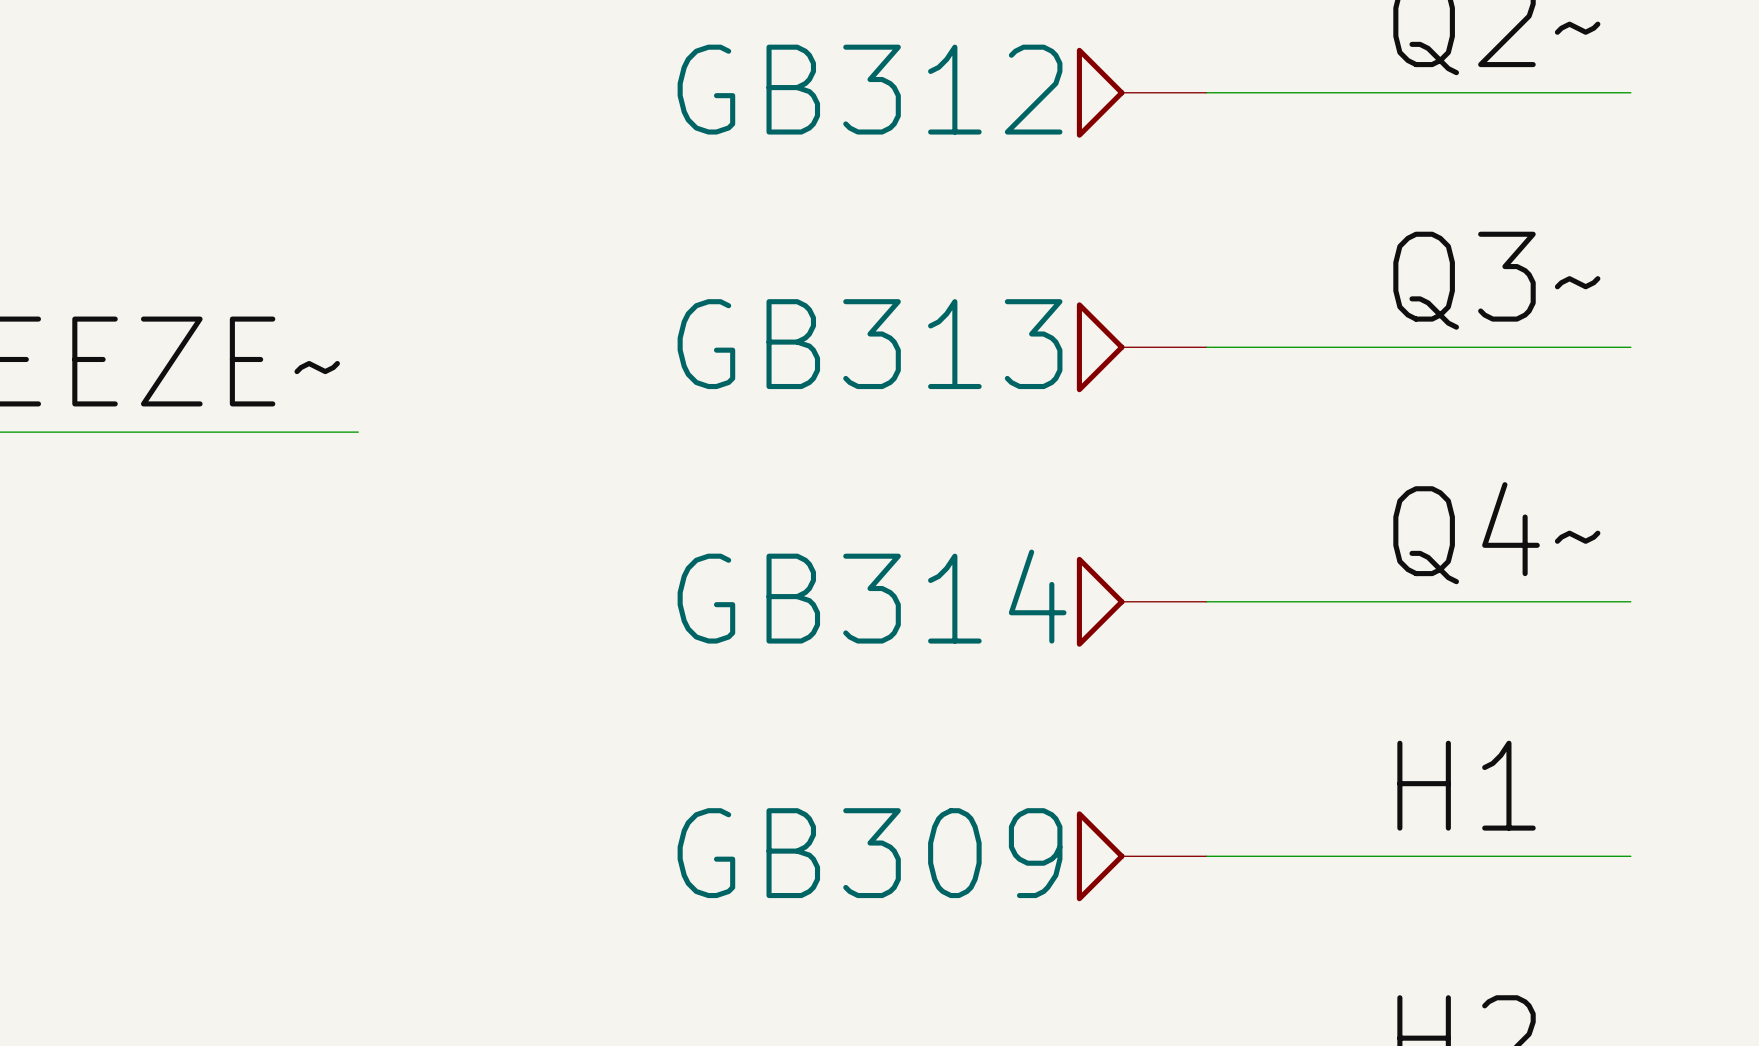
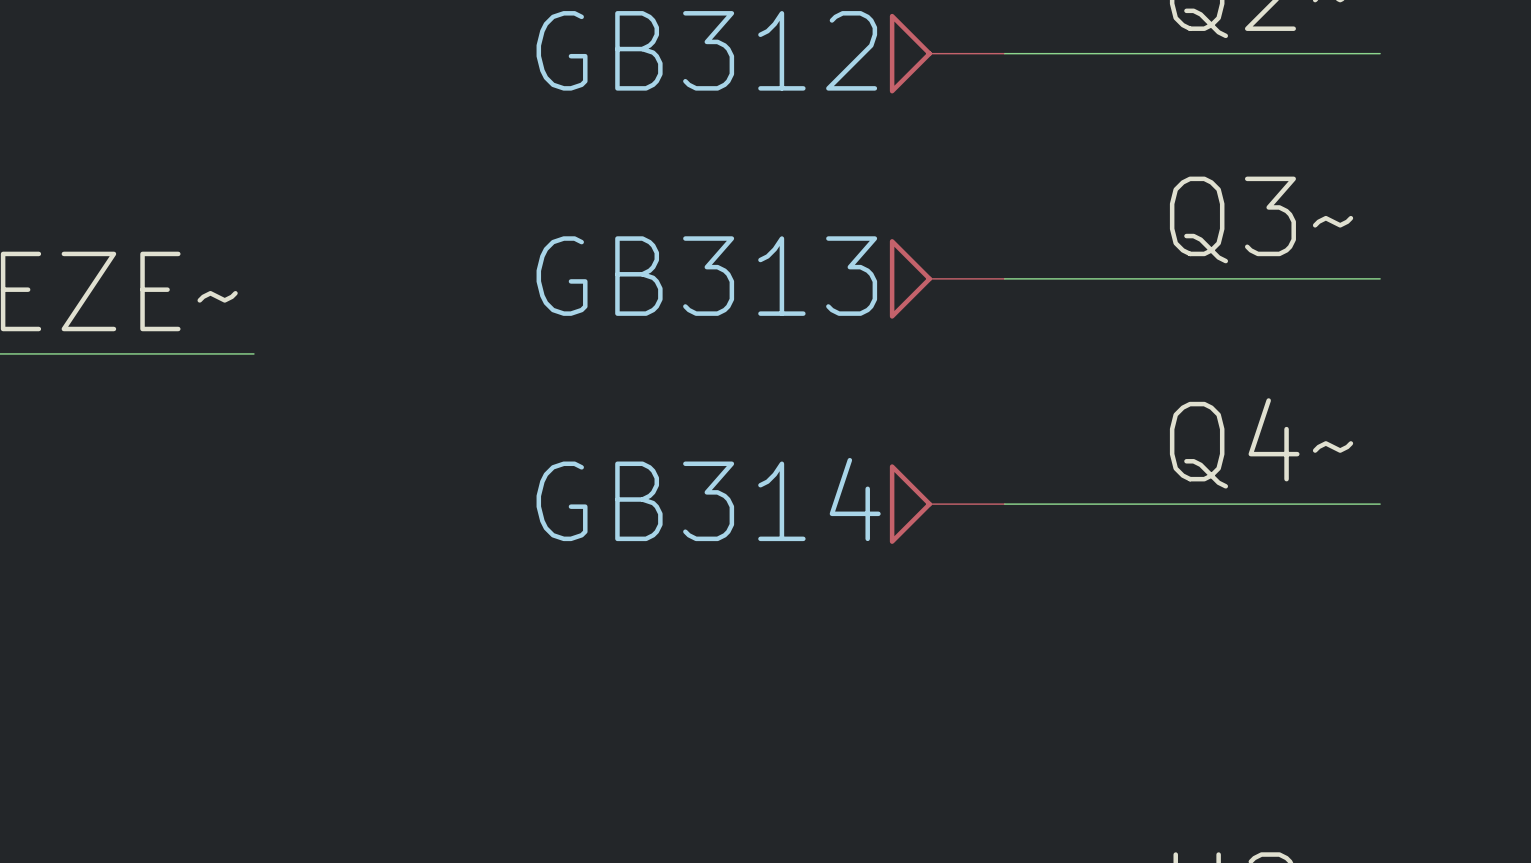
label: H1 (1466, 785) -> none
GB309: (1141, 856) -> none
wire: (1206, 856) (1630, 856) -> none

